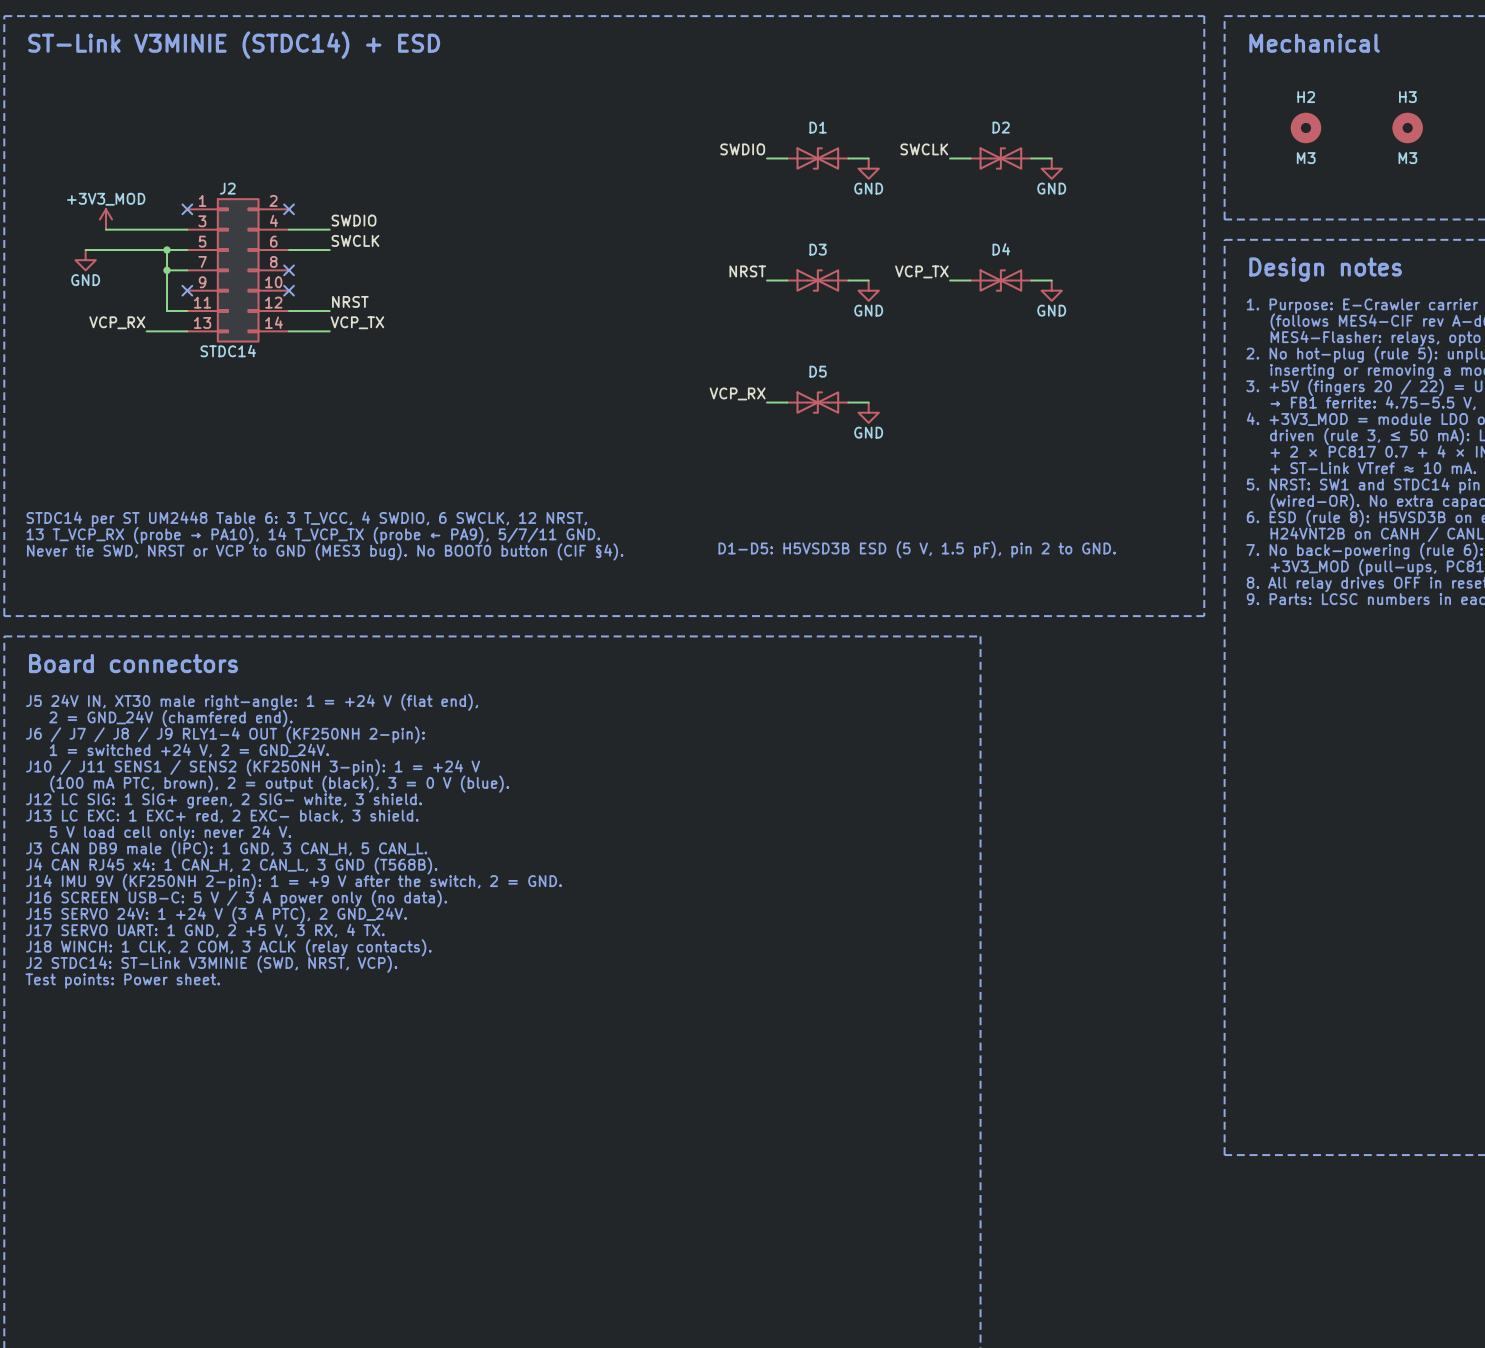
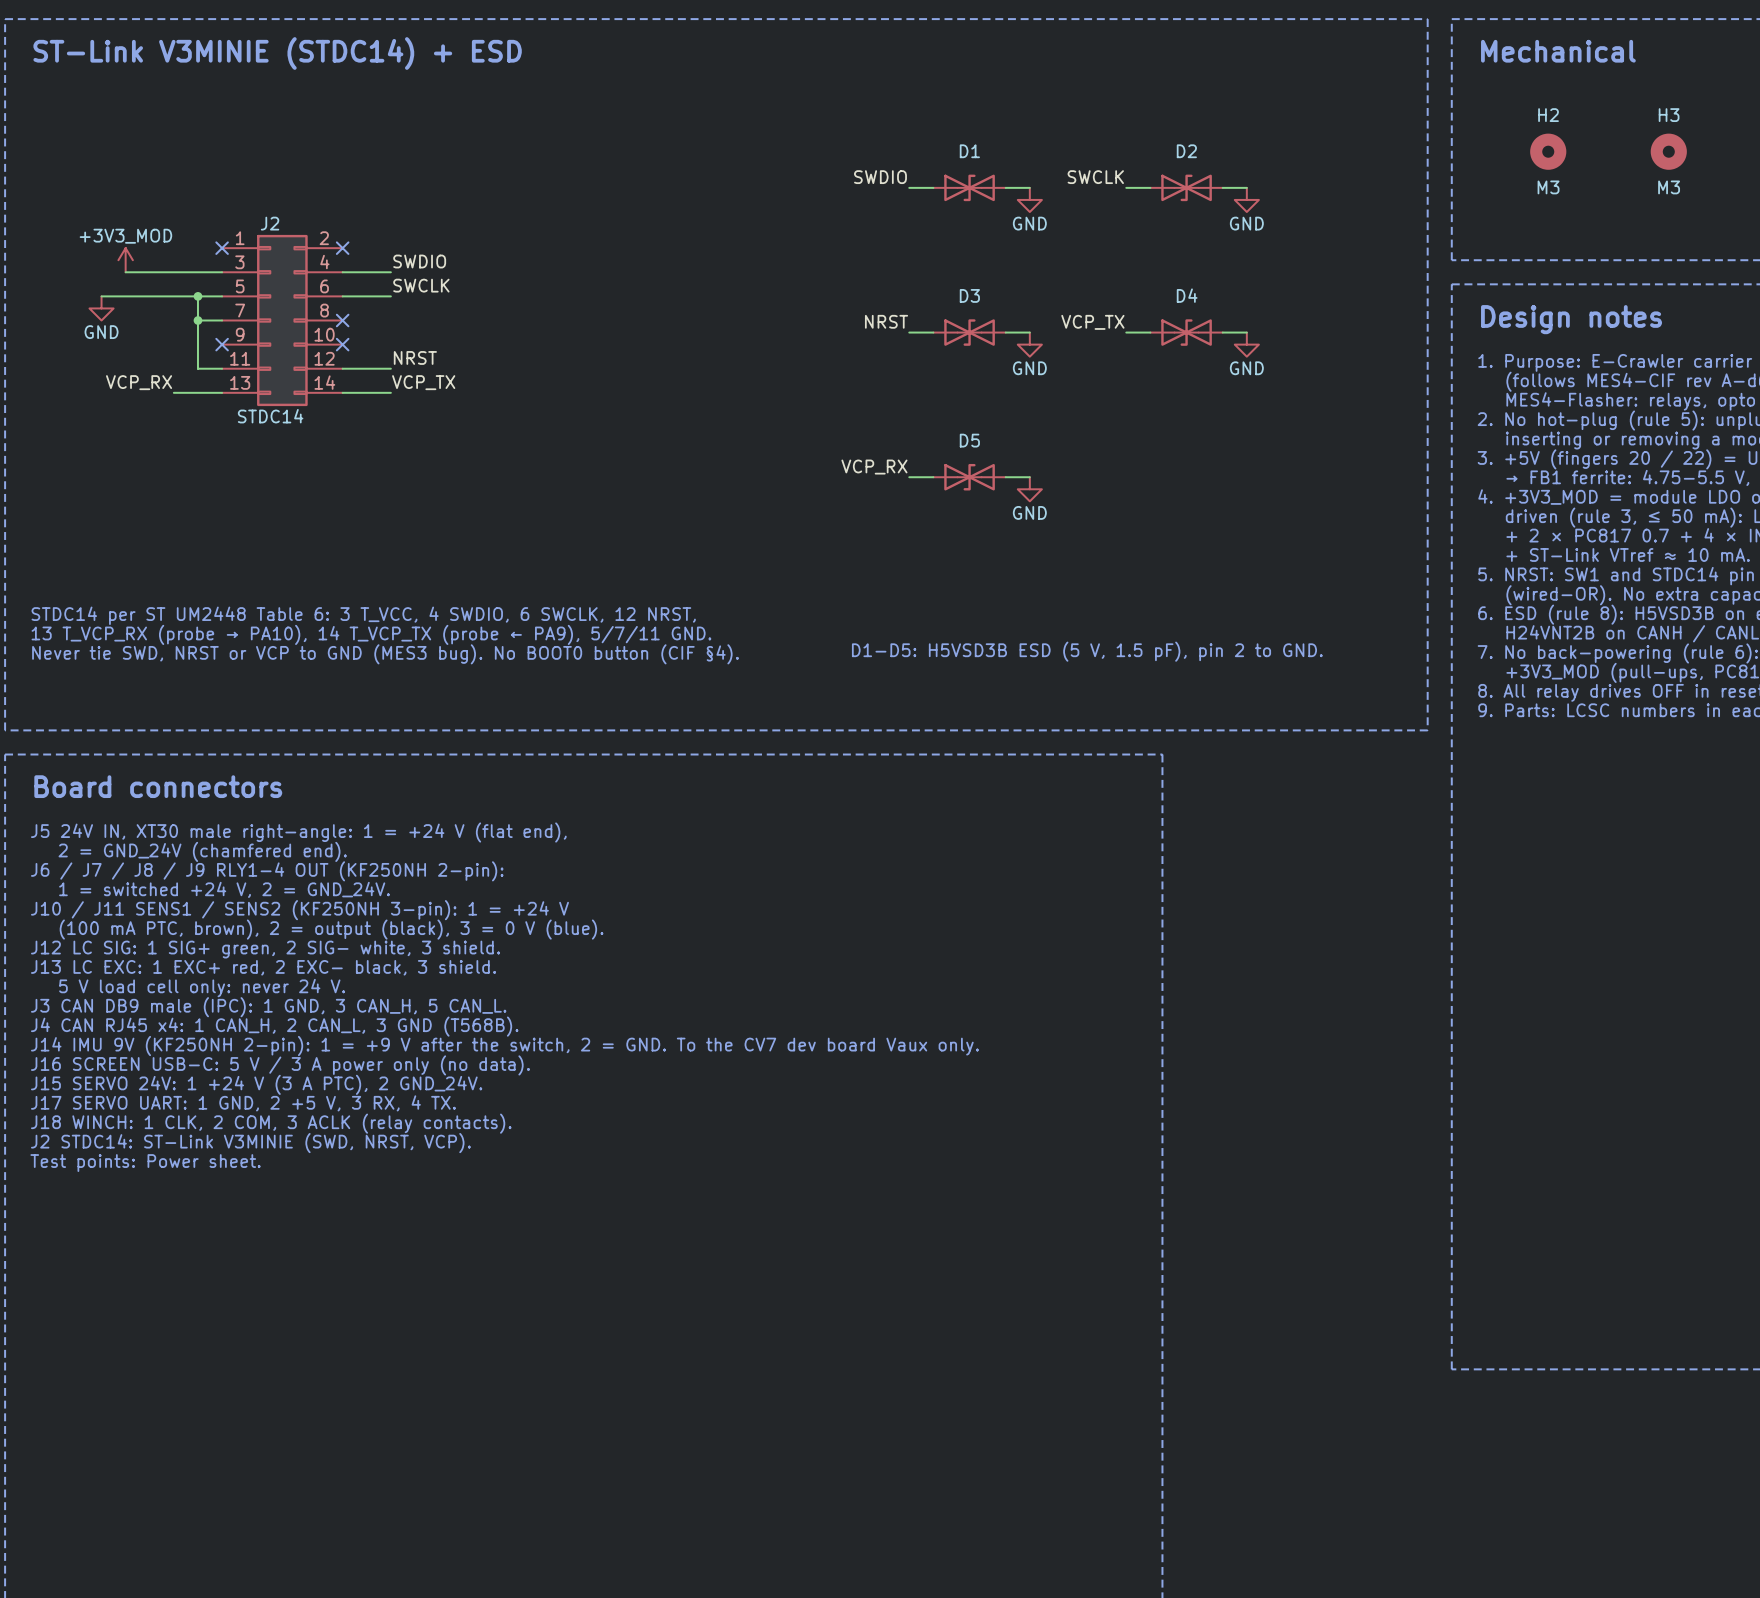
text: J14 IMU 9V (KF250NH 2-pin): 1 = +9 V after the switch, 2 = GND. (293, 882) -> J14 IMU 9V (KF250NH 2-pin): 1 = +9 V after the switch, 2 = GND. To the CV7 dev board Vaux only. (504, 1046)

